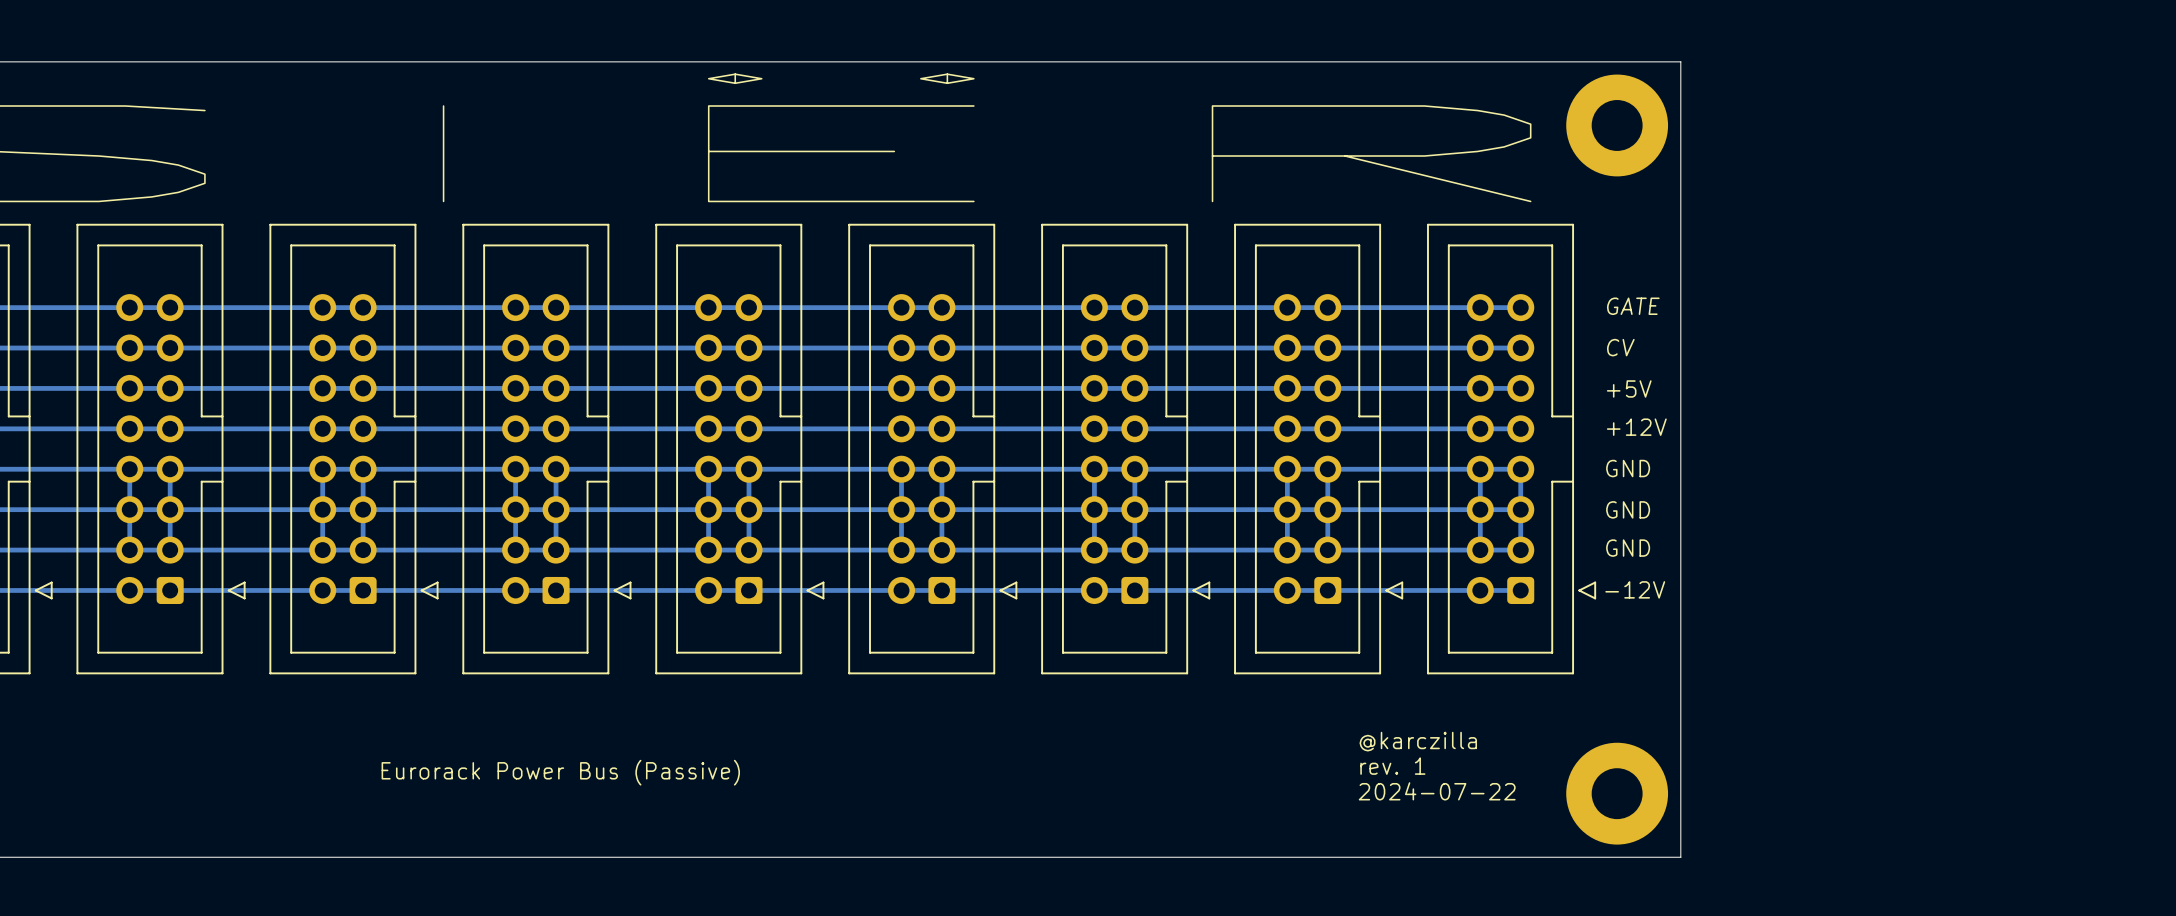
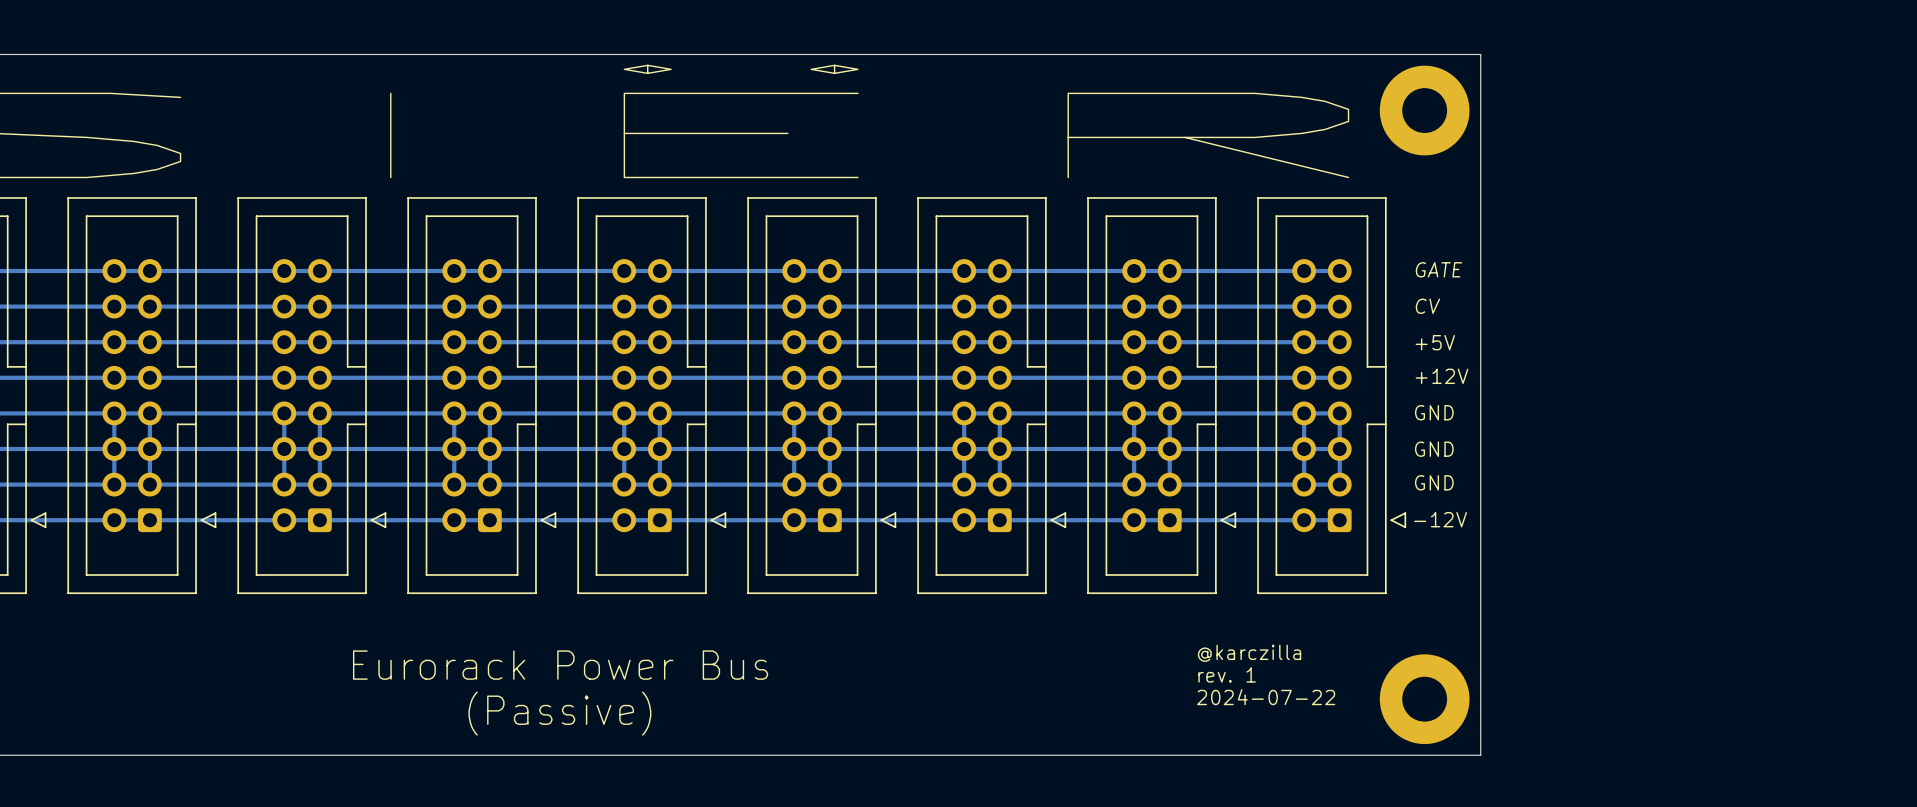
text: Eurorack Power Bus (Passive) (560, 772) -> Eurorack Power Bus (560, 665)
text: none -> (Passive) (559, 713)

